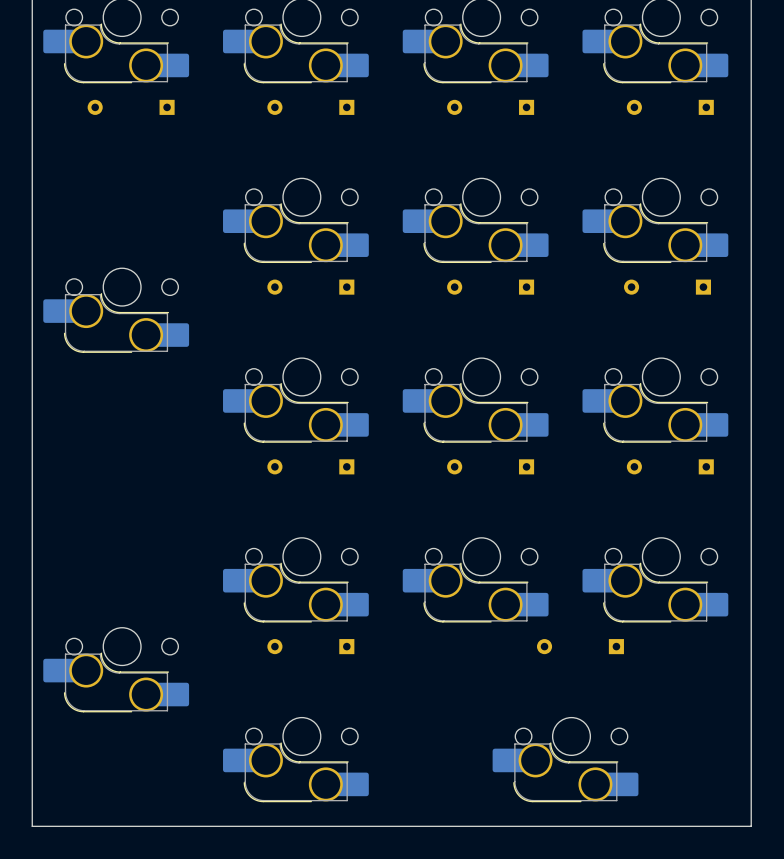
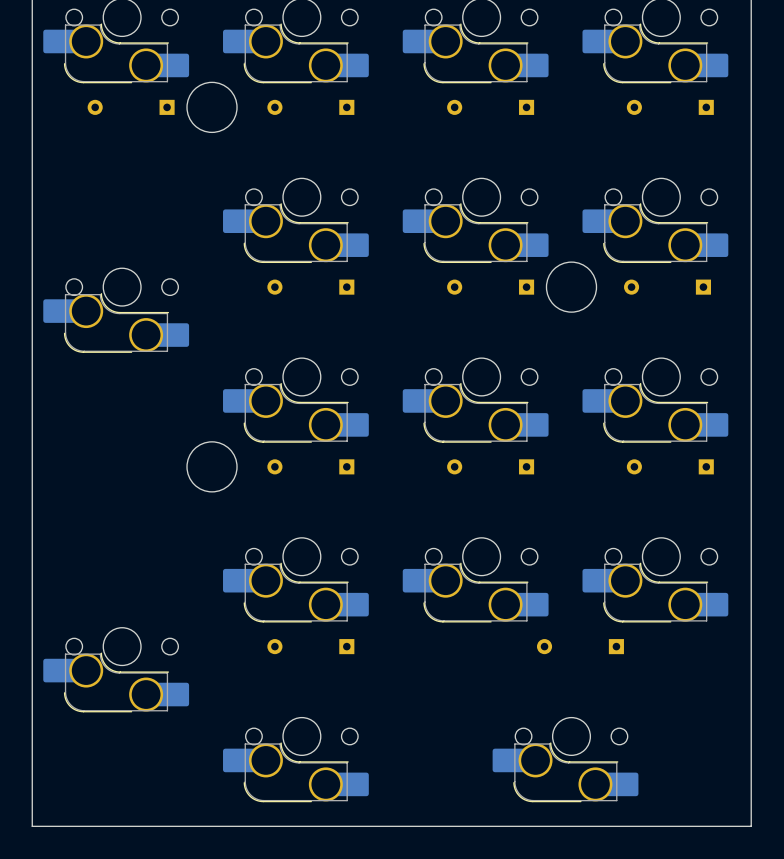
round board edge: none -> [186, 82, 238, 133]
round board edge: none -> [546, 261, 597, 313]
round board edge: none -> [186, 441, 238, 493]

